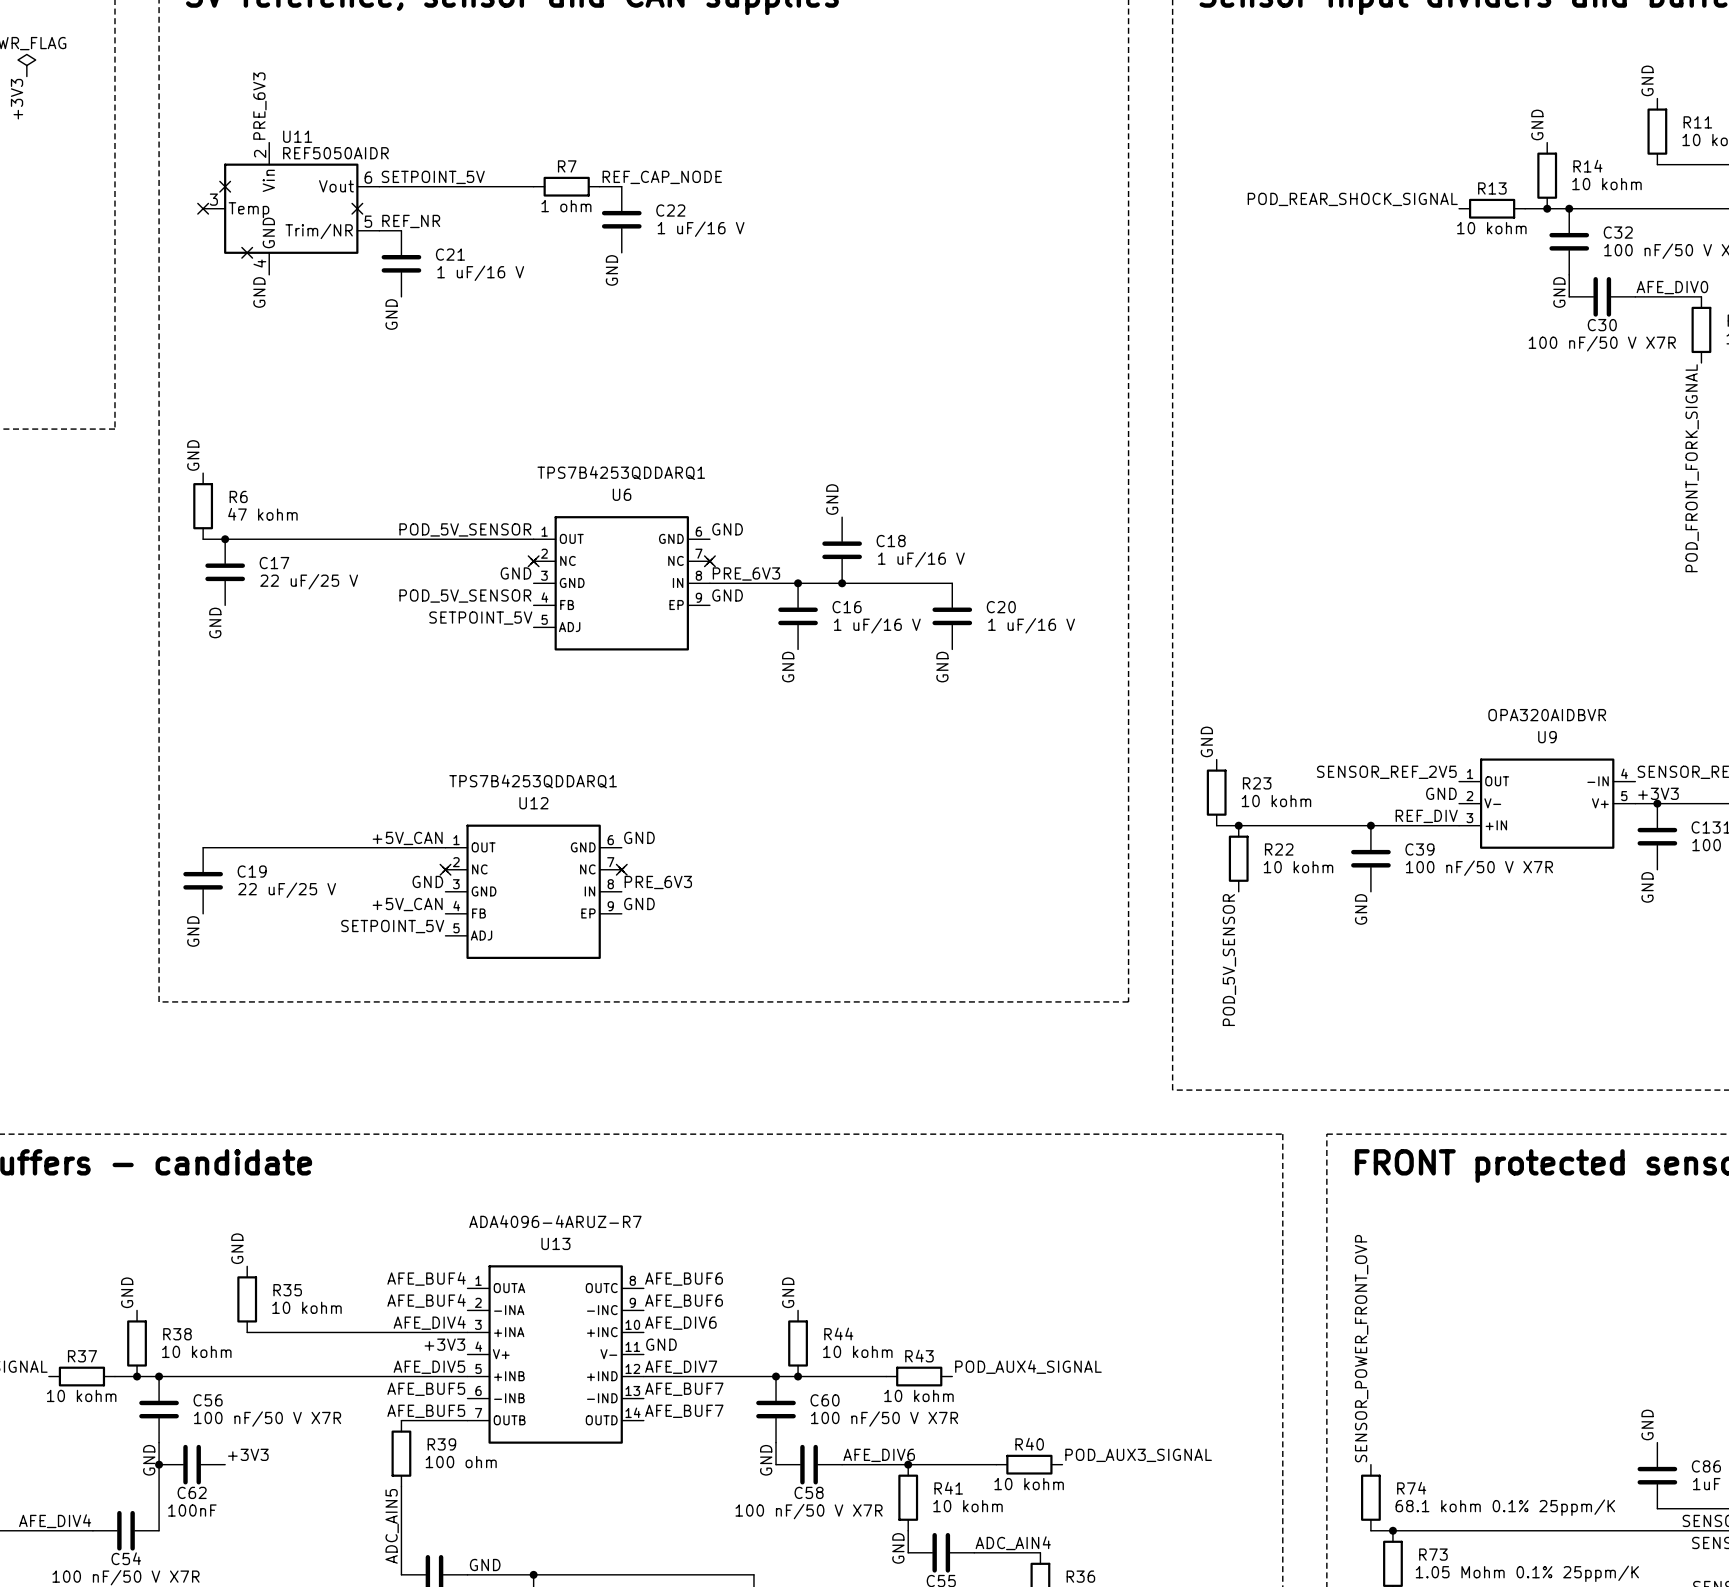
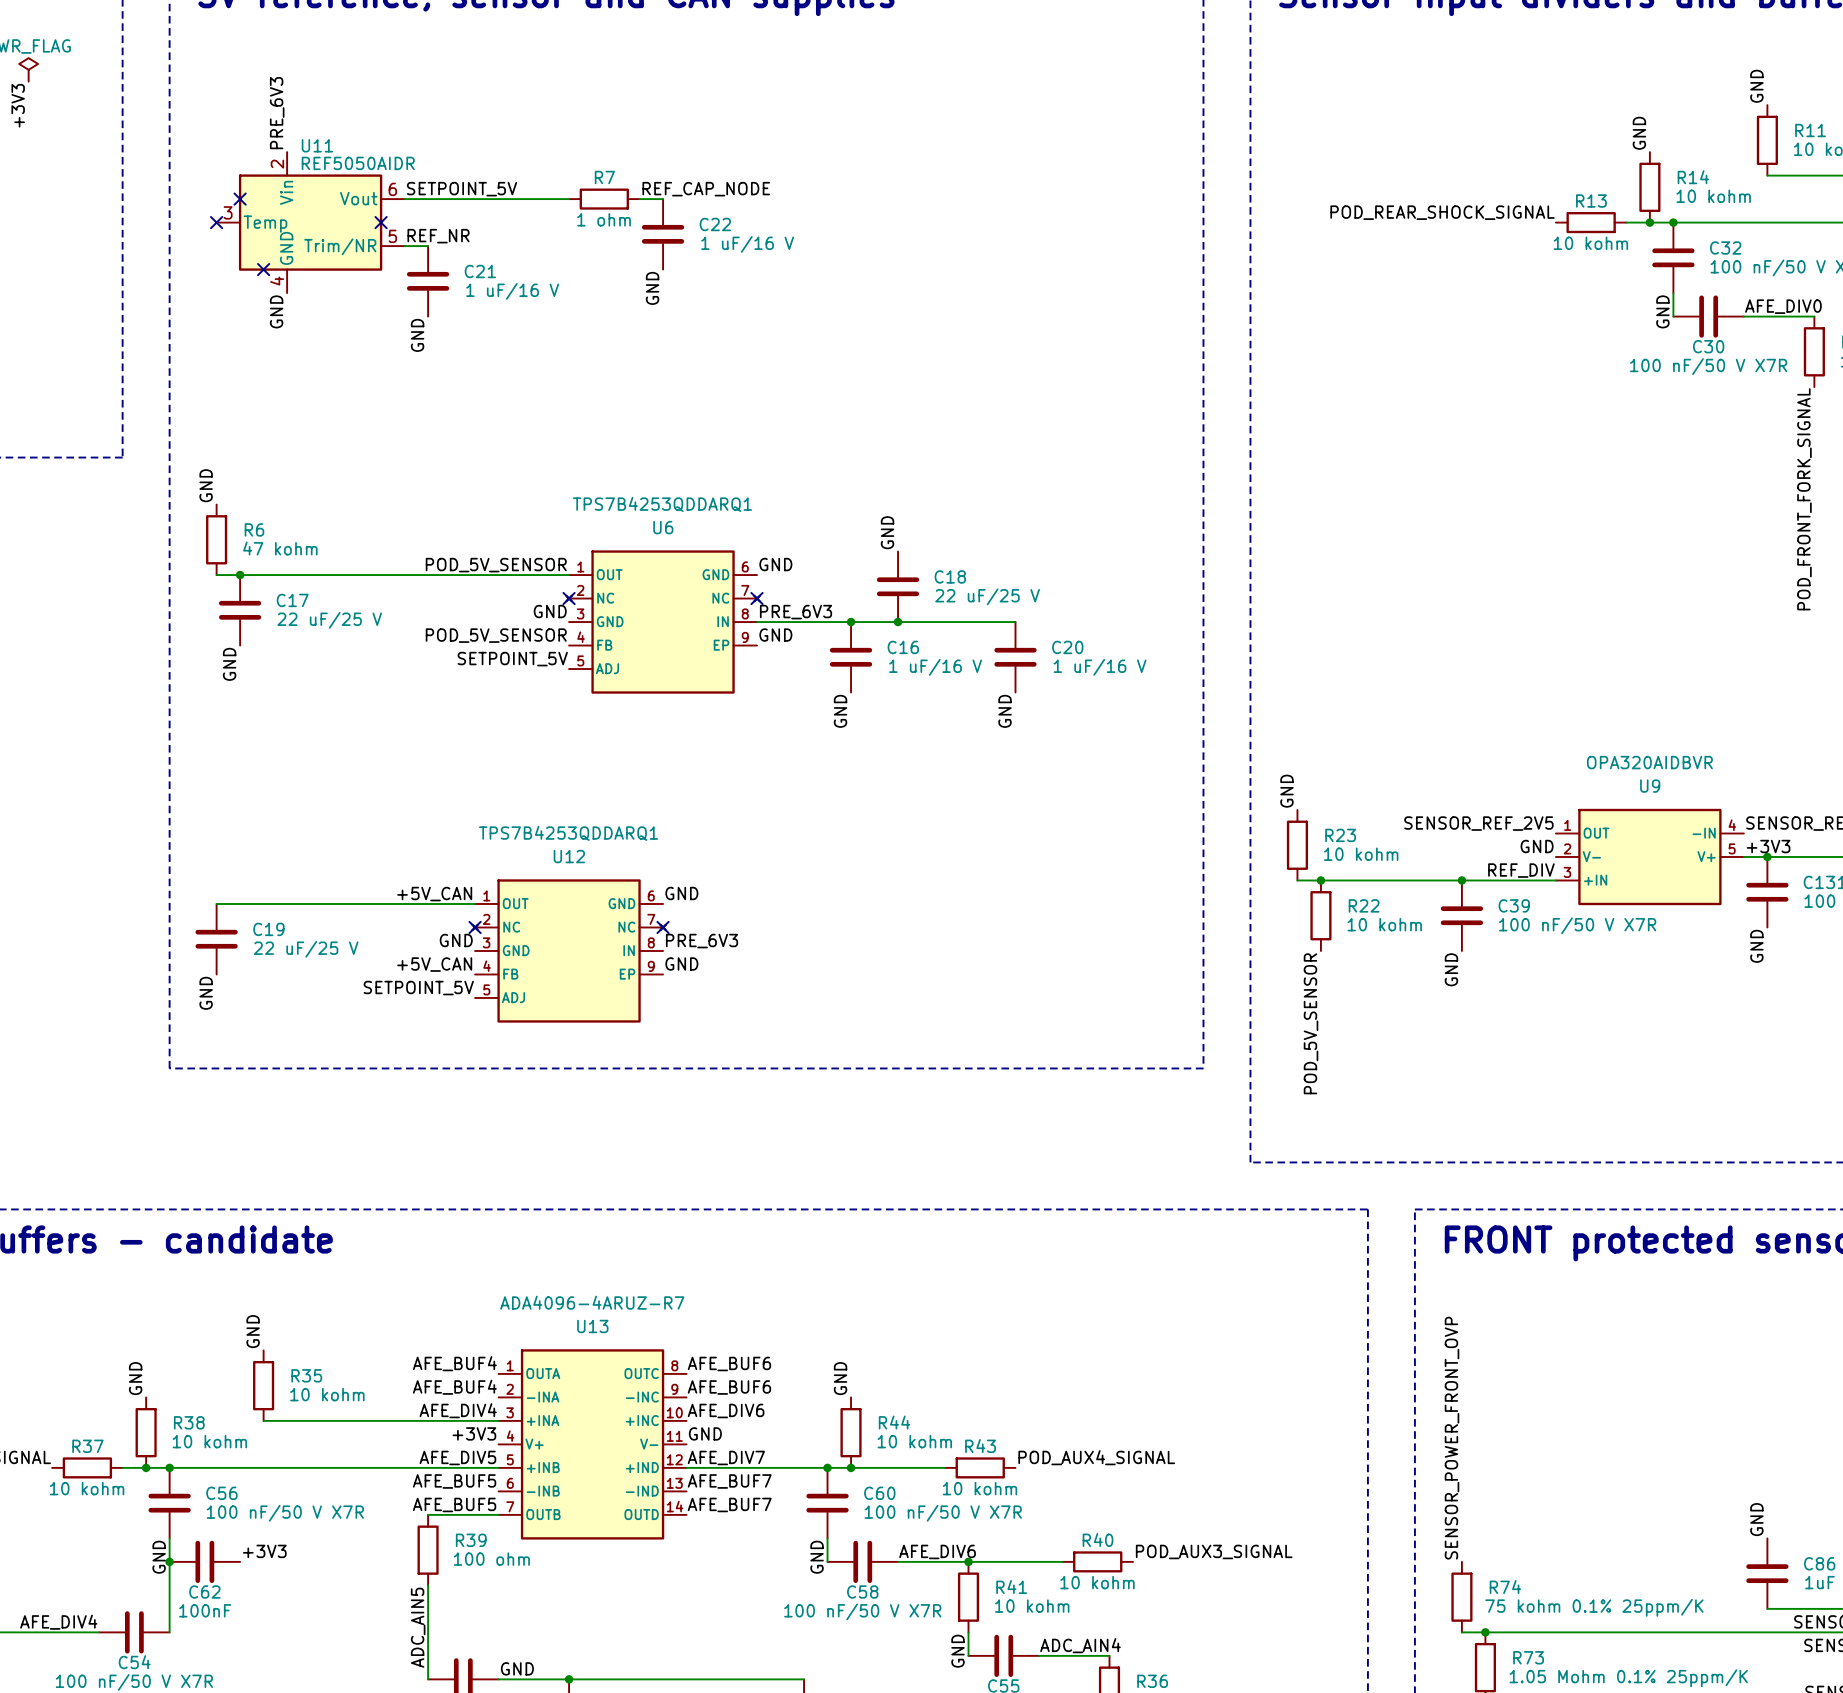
C18 value: 1 uF/16 V (921, 559) -> 22 uF/25 V (987, 596)
R74 value: 68.1 kohm 0.1% 25ppm/K (1505, 1507) -> 75 kohm 0.1% 25ppm/K (1594, 1607)

